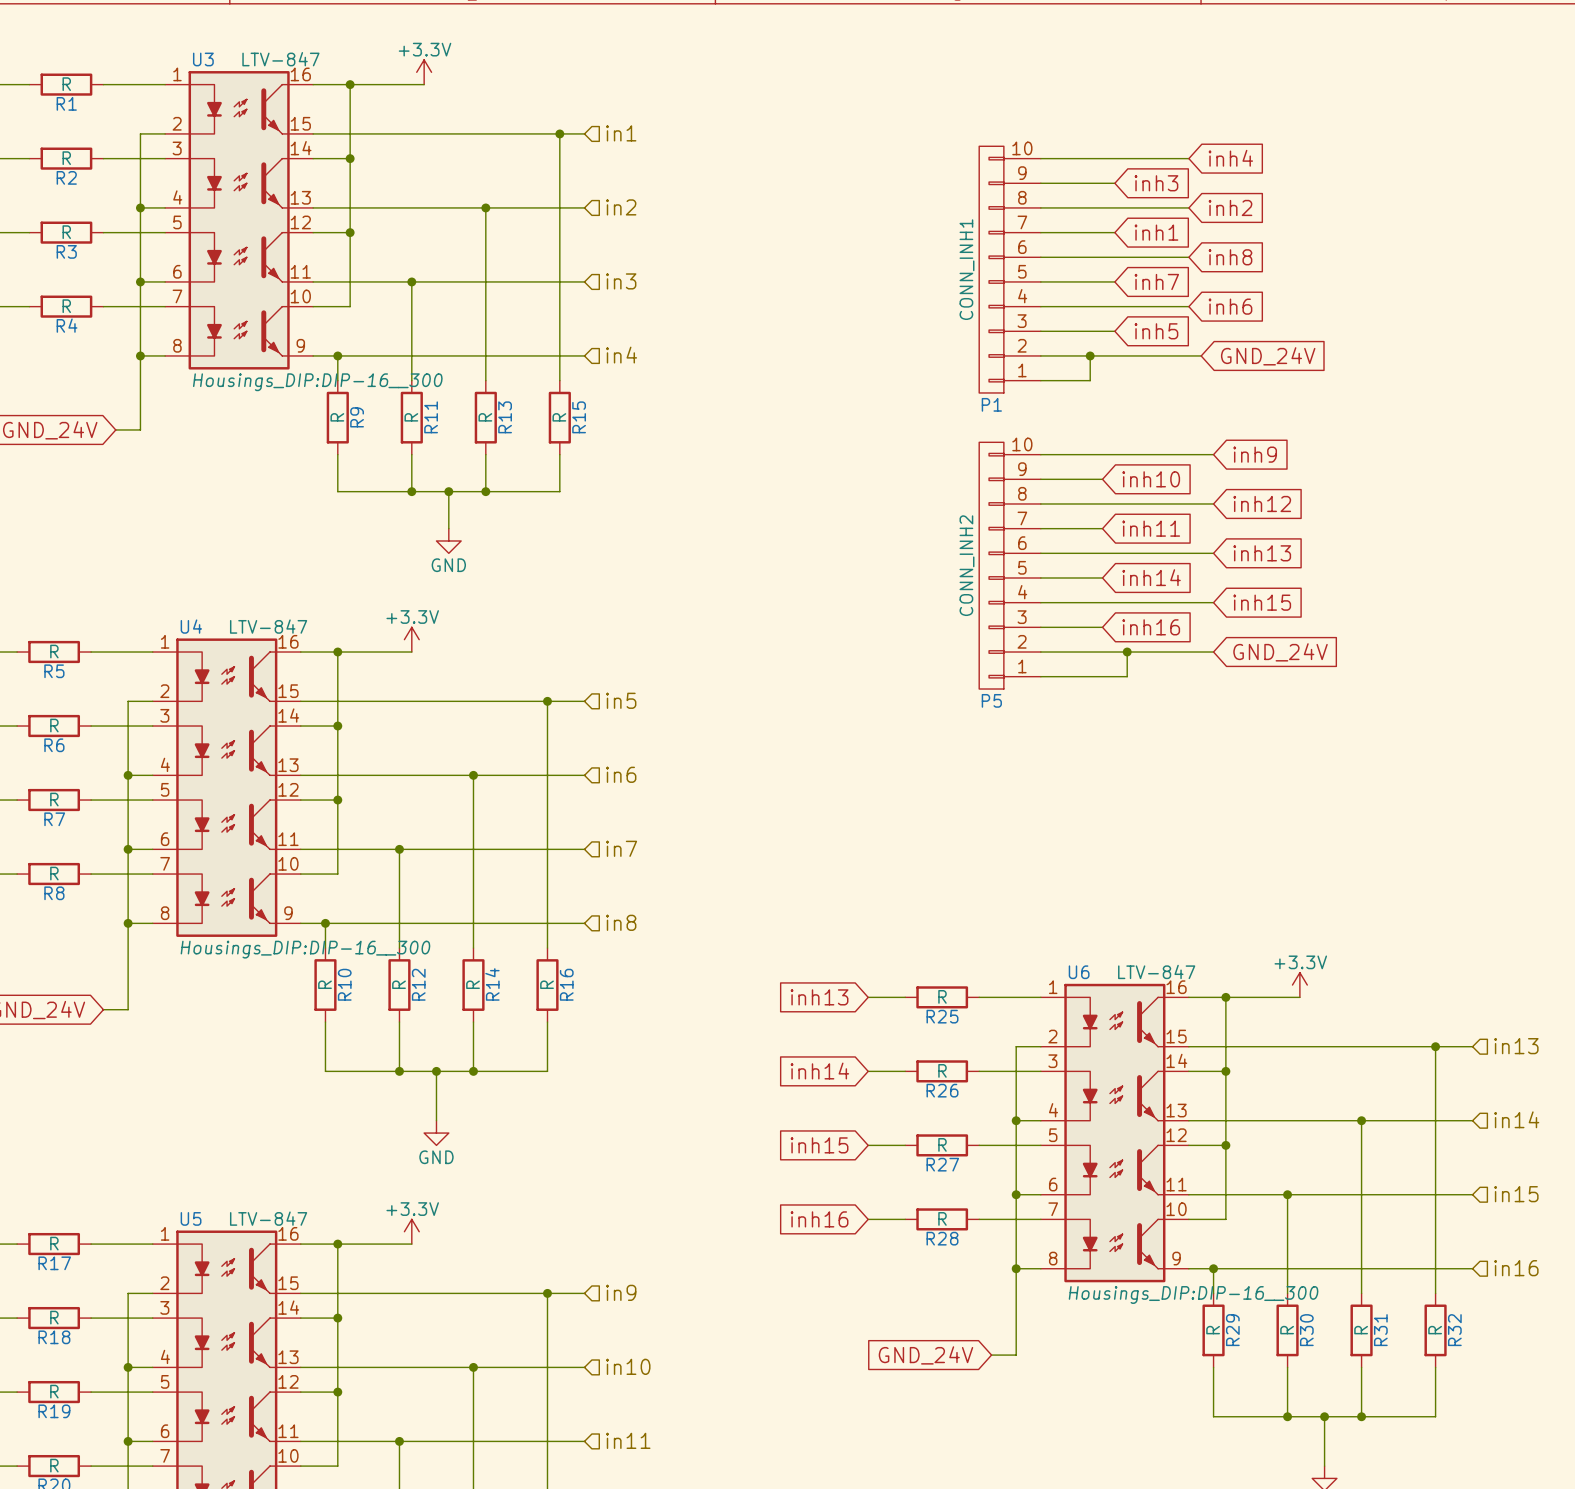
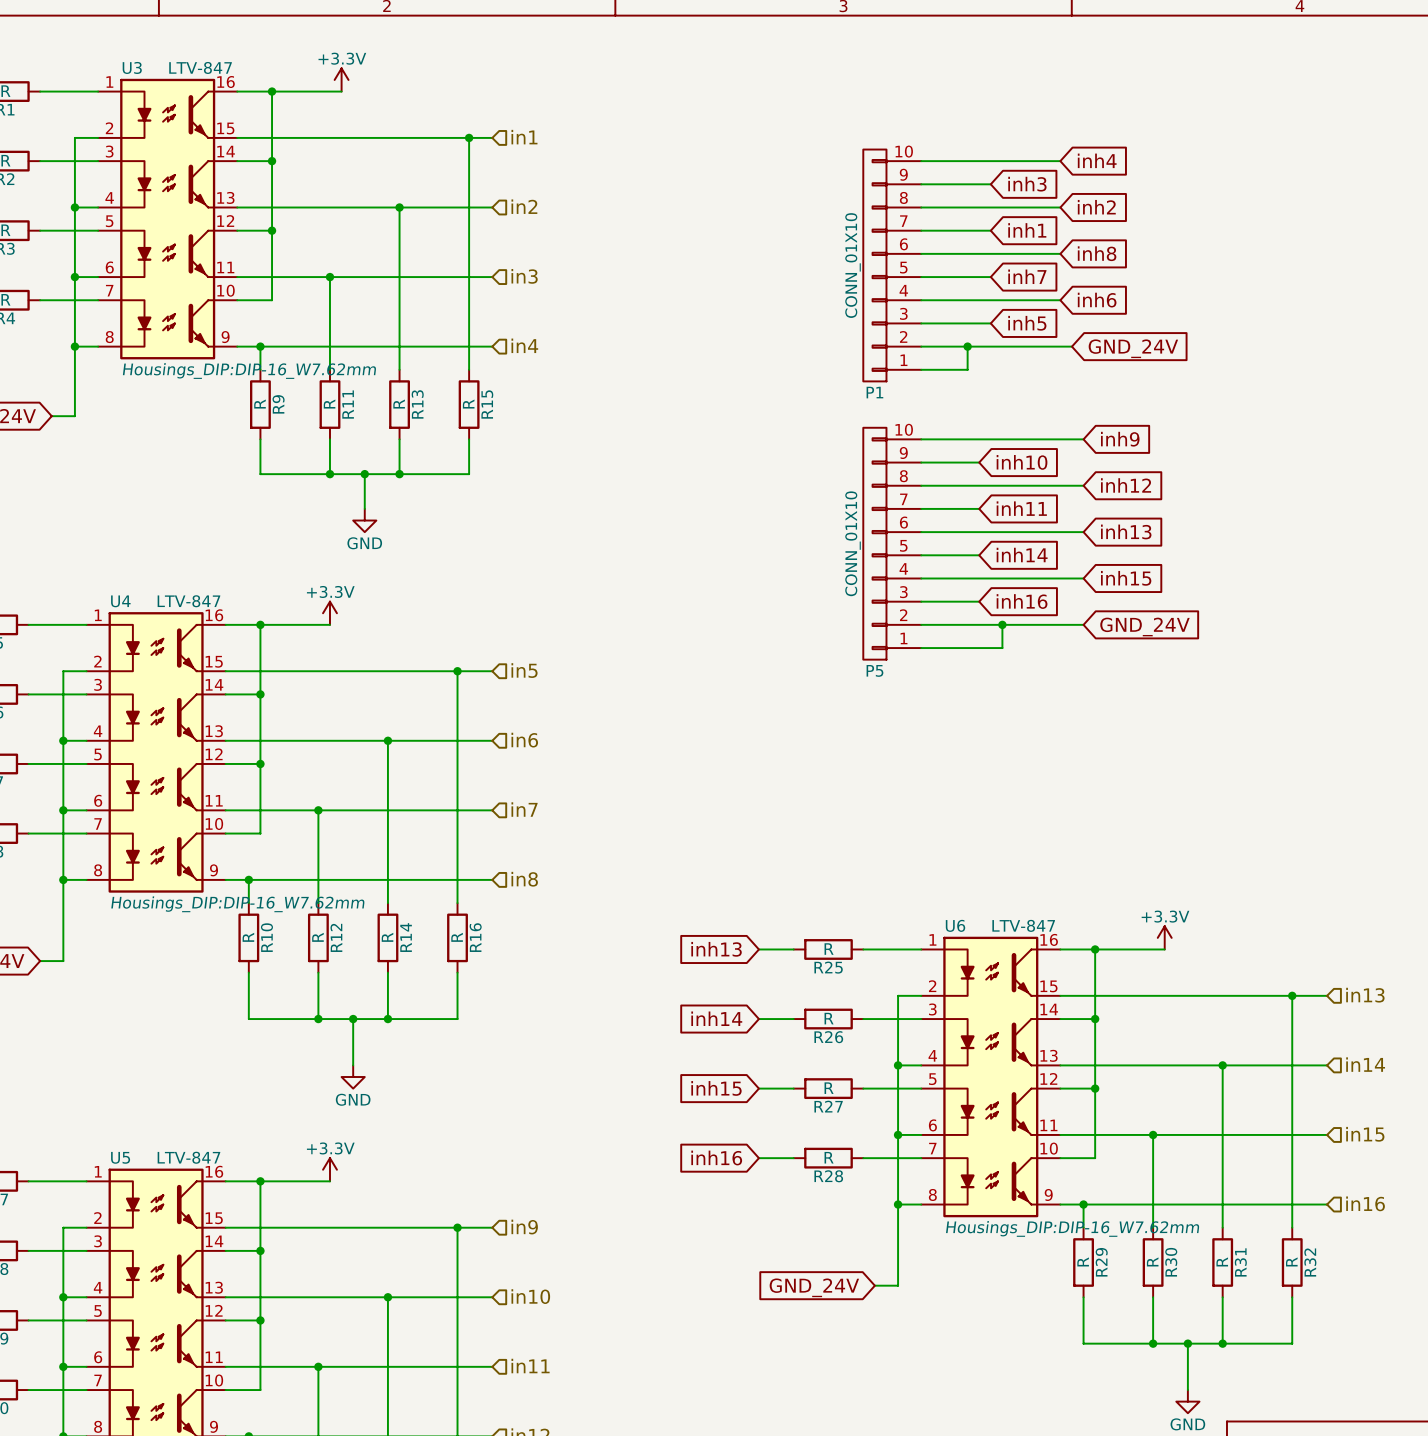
P1 value: CONN_INH1 (966, 269) -> CONN_01X10 (853, 265)
U3 text: Housings_DIP:DIP-16__300 (317, 382) -> Housings_DIP:DIP-16_W7.62mm (249, 371)
P5 value: CONN_INH2 (966, 565) -> CONN_01X10 (853, 543)
U4 text: Housings_DIP:DIP-16__300 (305, 949) -> Housings_DIP:DIP-16_W7.62mm (237, 904)
U6 text: Housings_DIP:DIP-16__300 (1193, 1294) -> Housings_DIP:DIP-16_W7.62mm (1072, 1228)

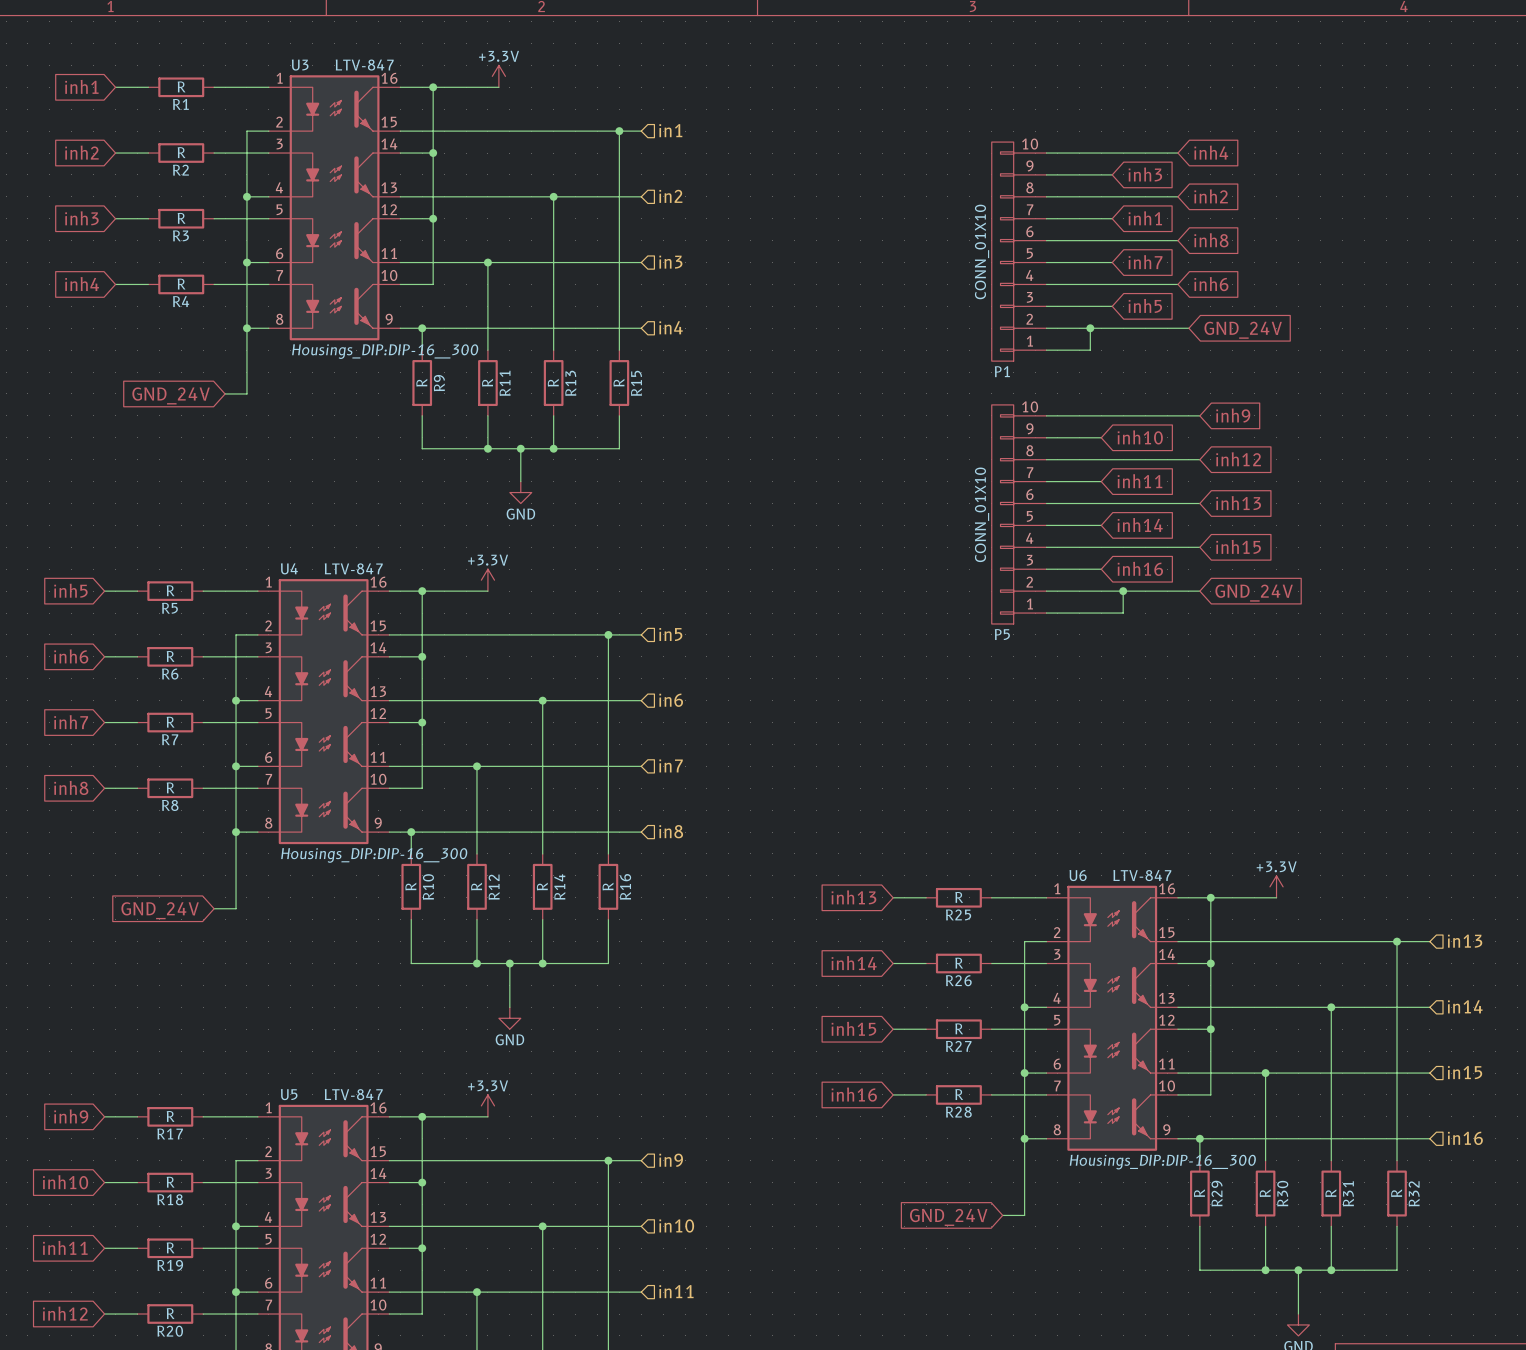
U3 text: Housings_DIP:DIP-16_W7.62mm (249, 371) -> Housings_DIP:DIP-16__300 (385, 351)
U4 text: Housings_DIP:DIP-16_W7.62mm (237, 904) -> Housings_DIP:DIP-16__300 (374, 855)
U6 text: Housings_DIP:DIP-16_W7.62mm (1072, 1228) -> Housings_DIP:DIP-16__300 (1162, 1162)

